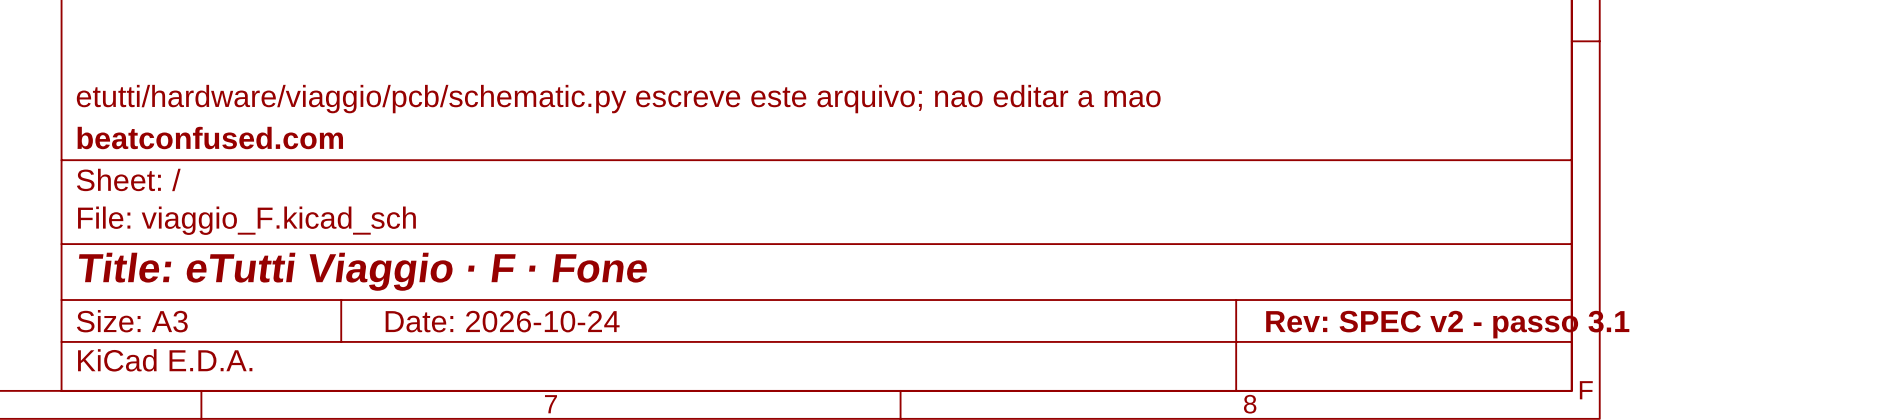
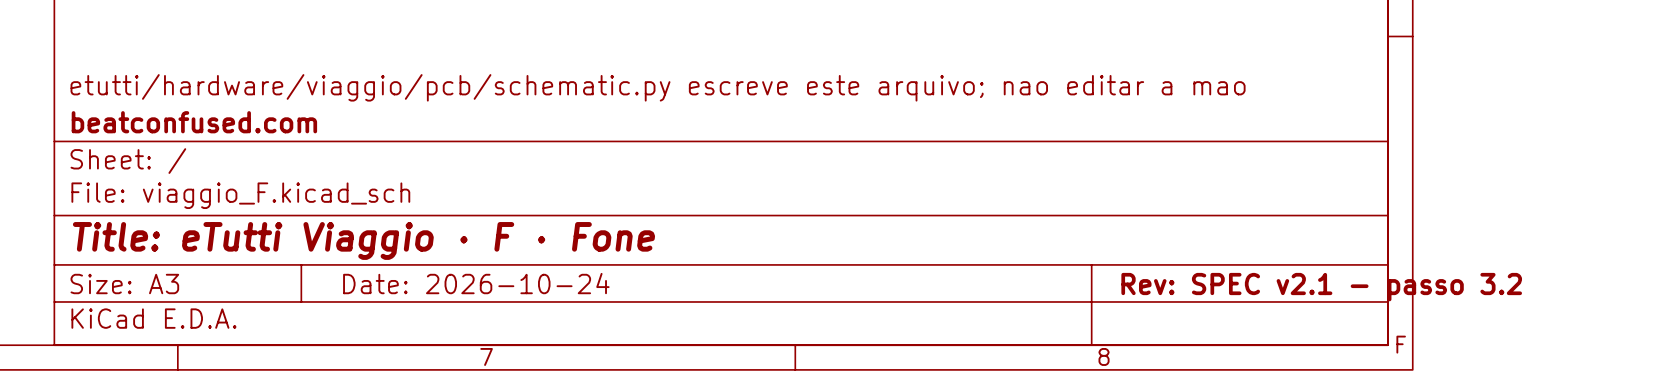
title block: Rev: SPEC v2 - passo 3.1 (1447, 324) -> Rev: SPEC v2.1 - passo 3.2 (1321, 287)

